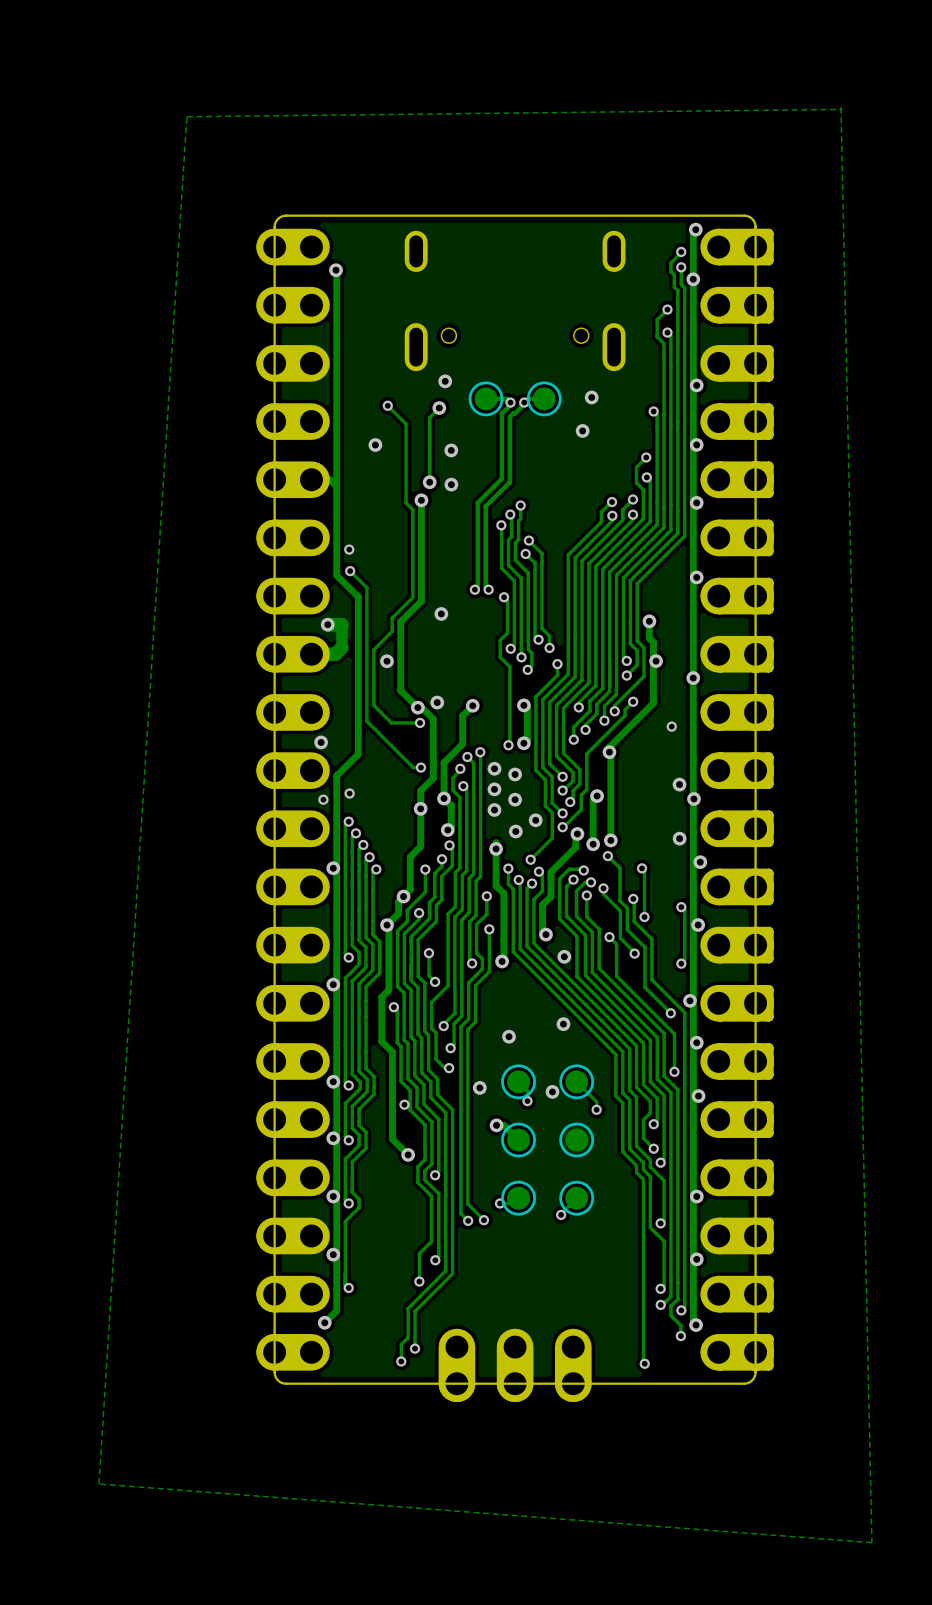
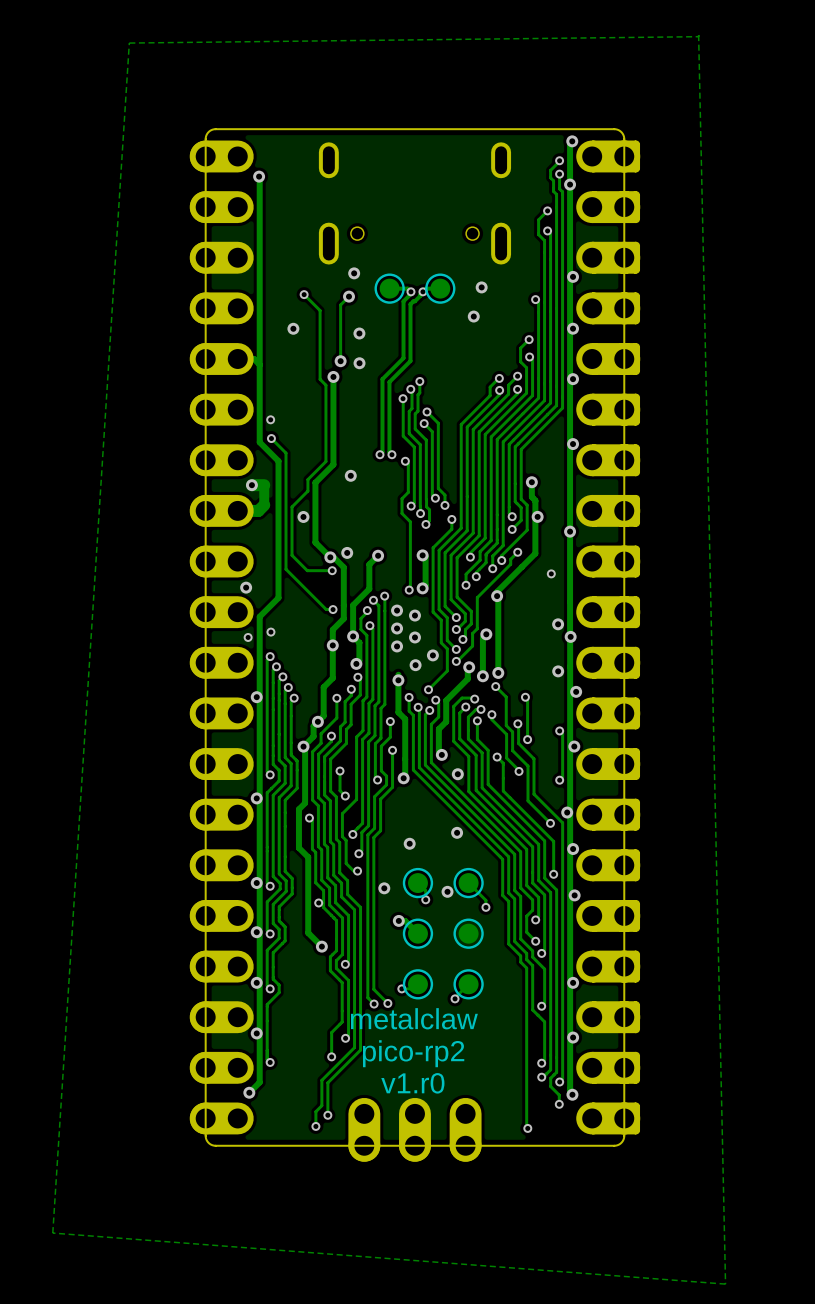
text: none -> metalclaw (414, 1018)
text: none -> pico-rp2 (413, 1053)
text: none -> v1.r0 (412, 1083)

